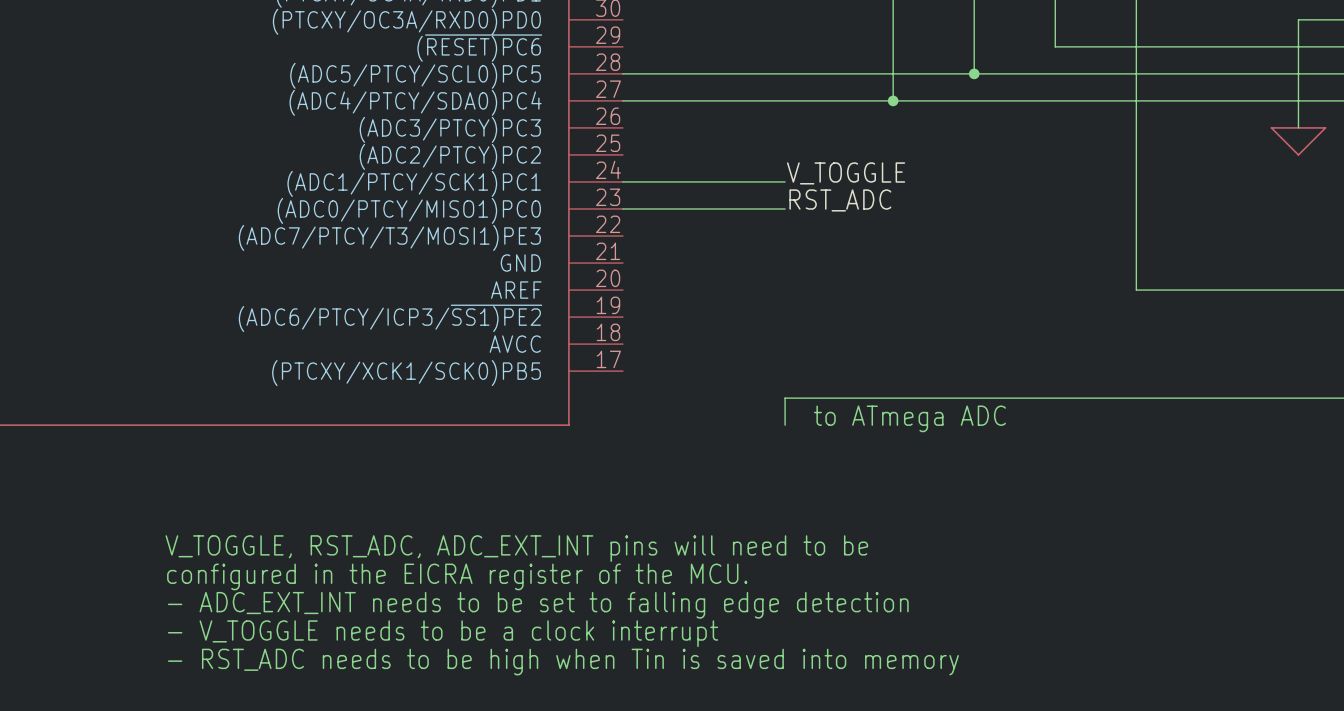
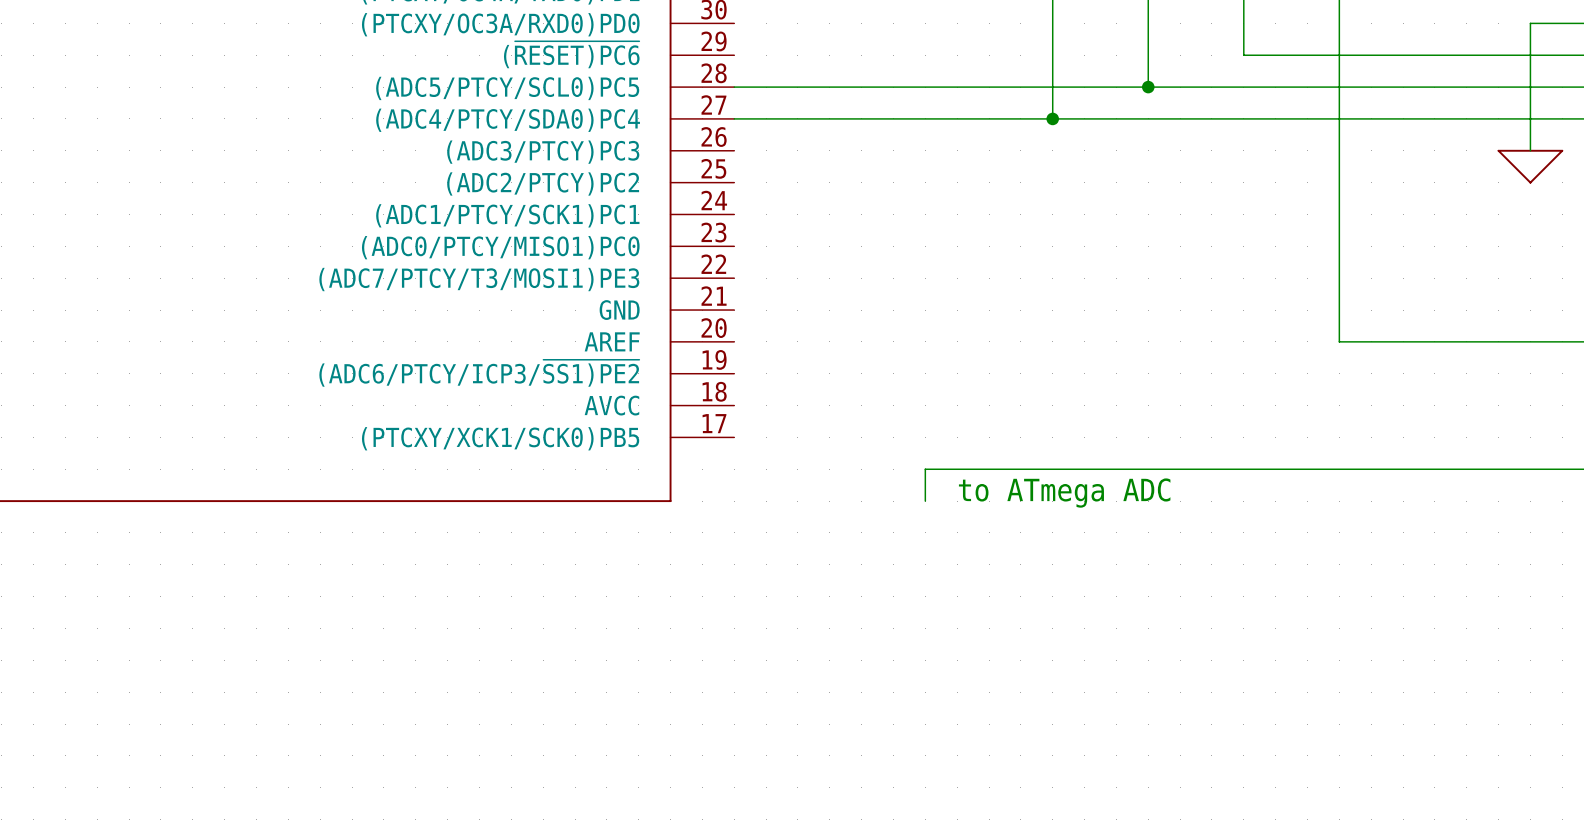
label: V_TOGGLE (846, 173) -> none
wire: (622, 181) (785, 181) -> none
label: RST_ADC (840, 200) -> none
wire: (622, 208) (785, 208) -> none
text: V_TOGGLE, RST_ADC, ADC_EXT_INT pins will need to be (516, 548) -> none
text: configured in the EICRA register of the MCU. (457, 576) -> none
text: - ADC_EXT_INT needs to be set to falling edge detection (538, 605) -> none
text: - V_TOGGLE needs to be a clock interrupt (443, 633) -> none
text: - RST_ADC needs to be high when Tin is saved into memory (563, 662) -> none

